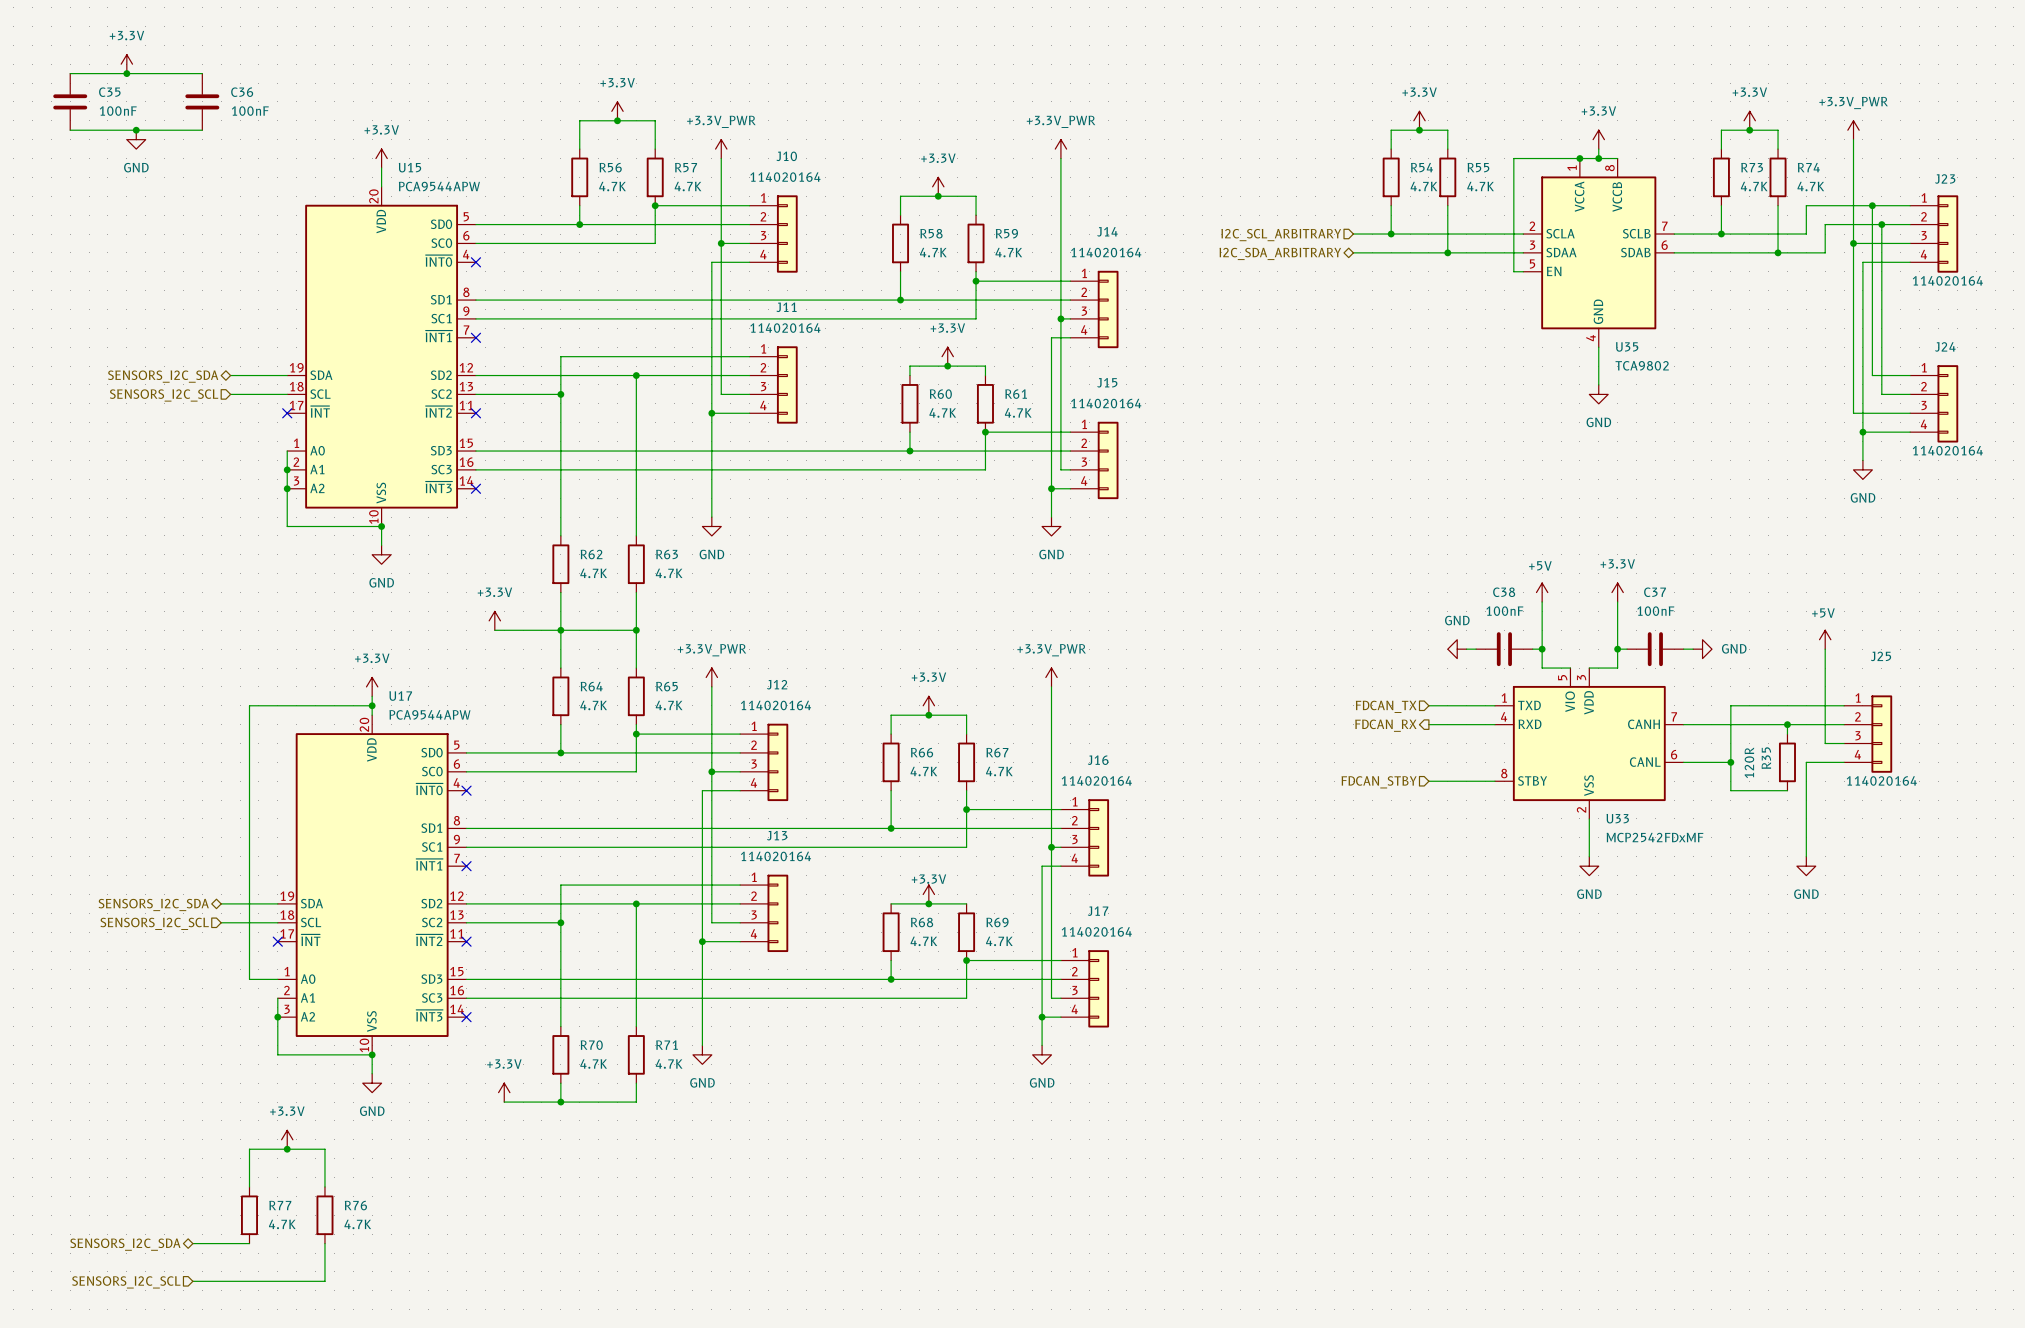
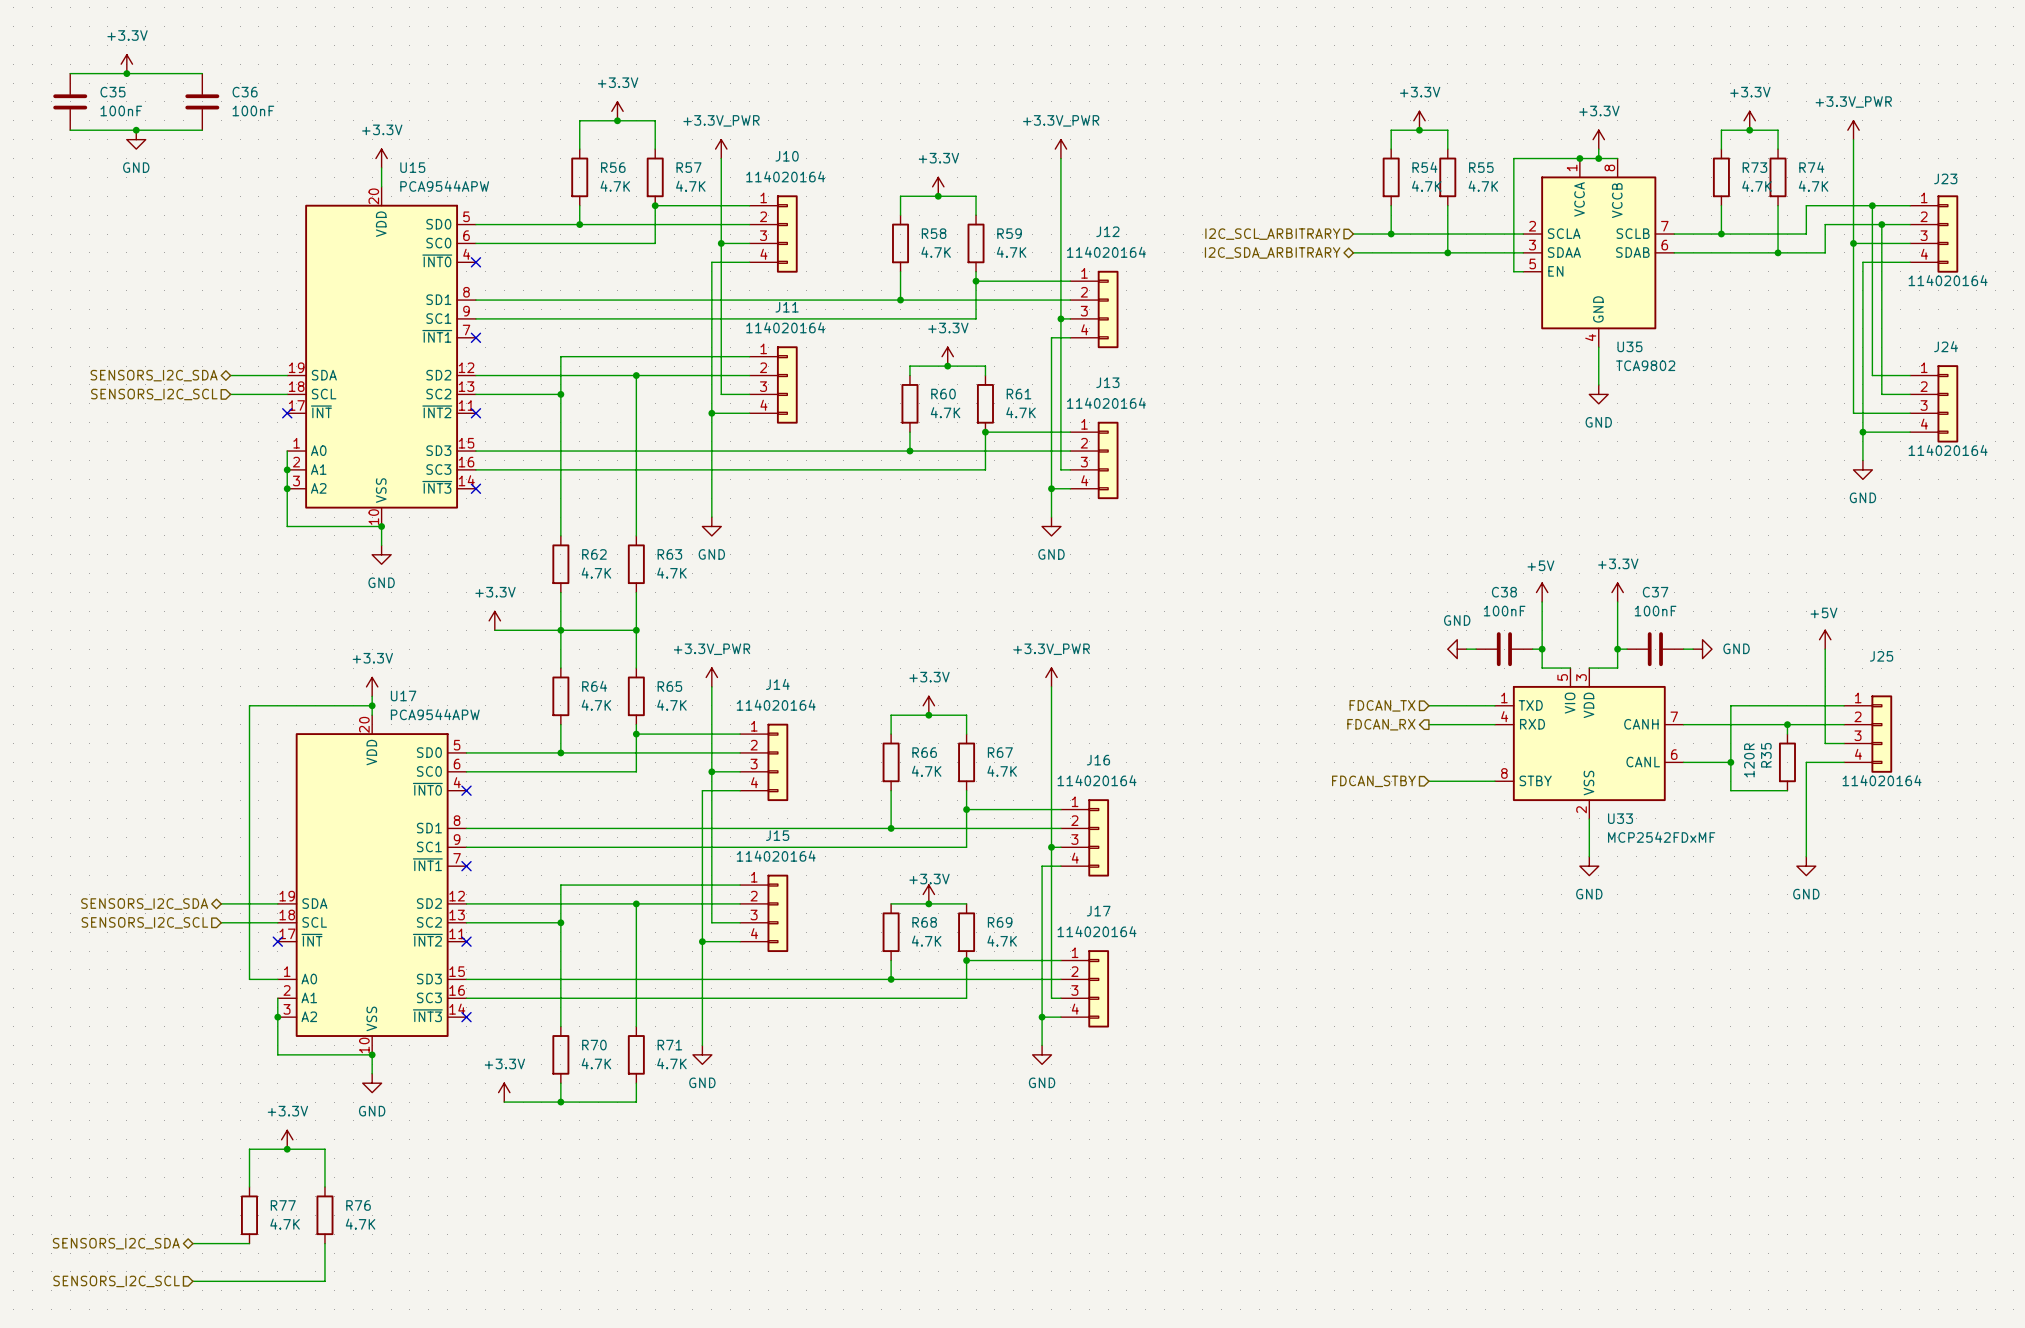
J14 name: J14 (1107, 231) -> J12 (1107, 231)
J15 name: J15 (1107, 382) -> J13 (1107, 382)
J12 name: J12 (777, 684) -> J14 (777, 684)
J13 name: J13 (777, 835) -> J15 (777, 835)

